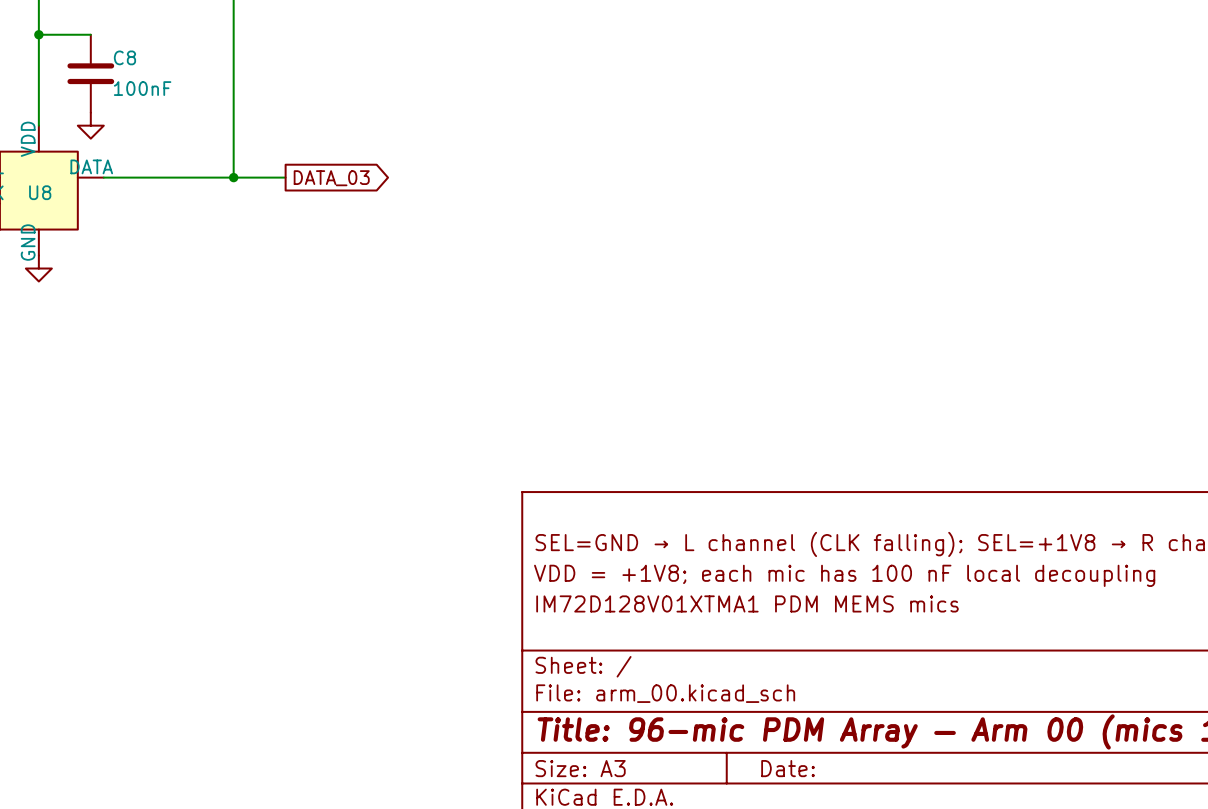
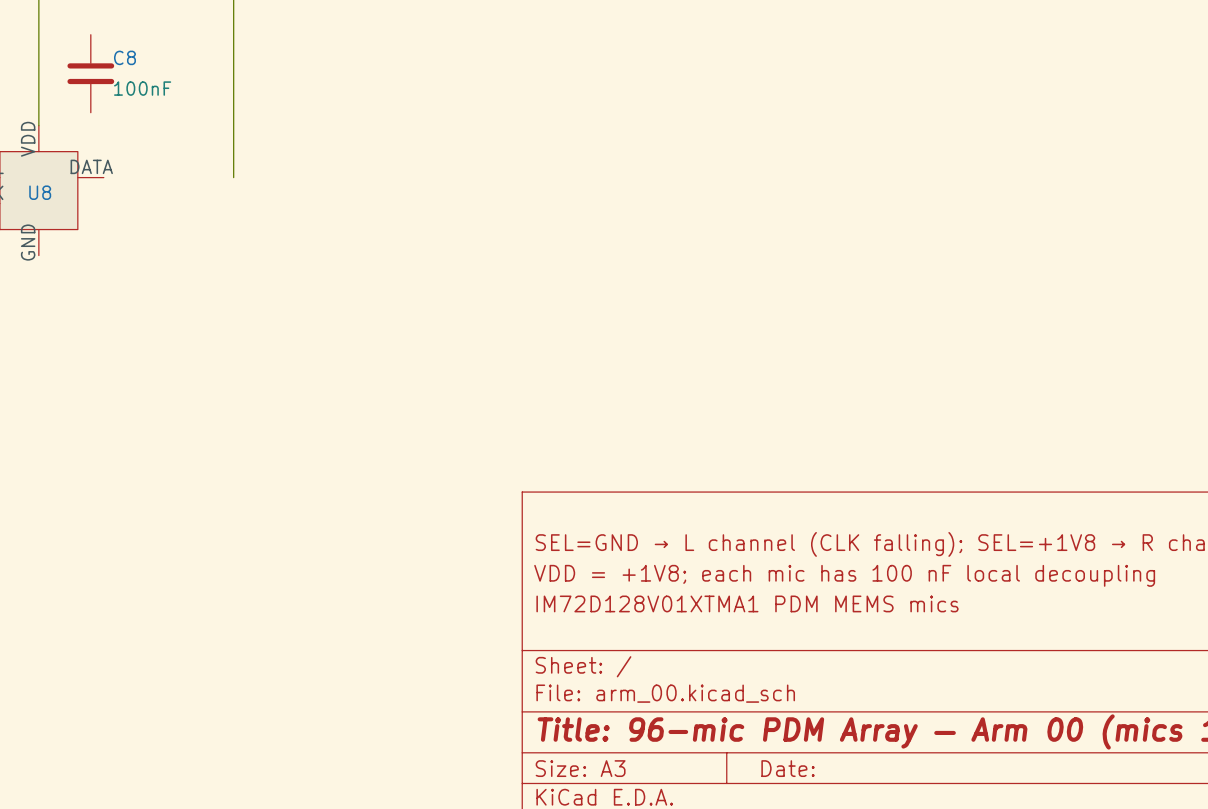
wire: (38, 34) (90, 34) -> none
junction: (38, 34) -> none
power symbol: (90, 125) -> none
wire: (103, 177) (285, 177) -> none
junction: (233, 177) -> none
global label: DATA_03 (331, 178) -> none
power symbol: (38, 268) -> none

